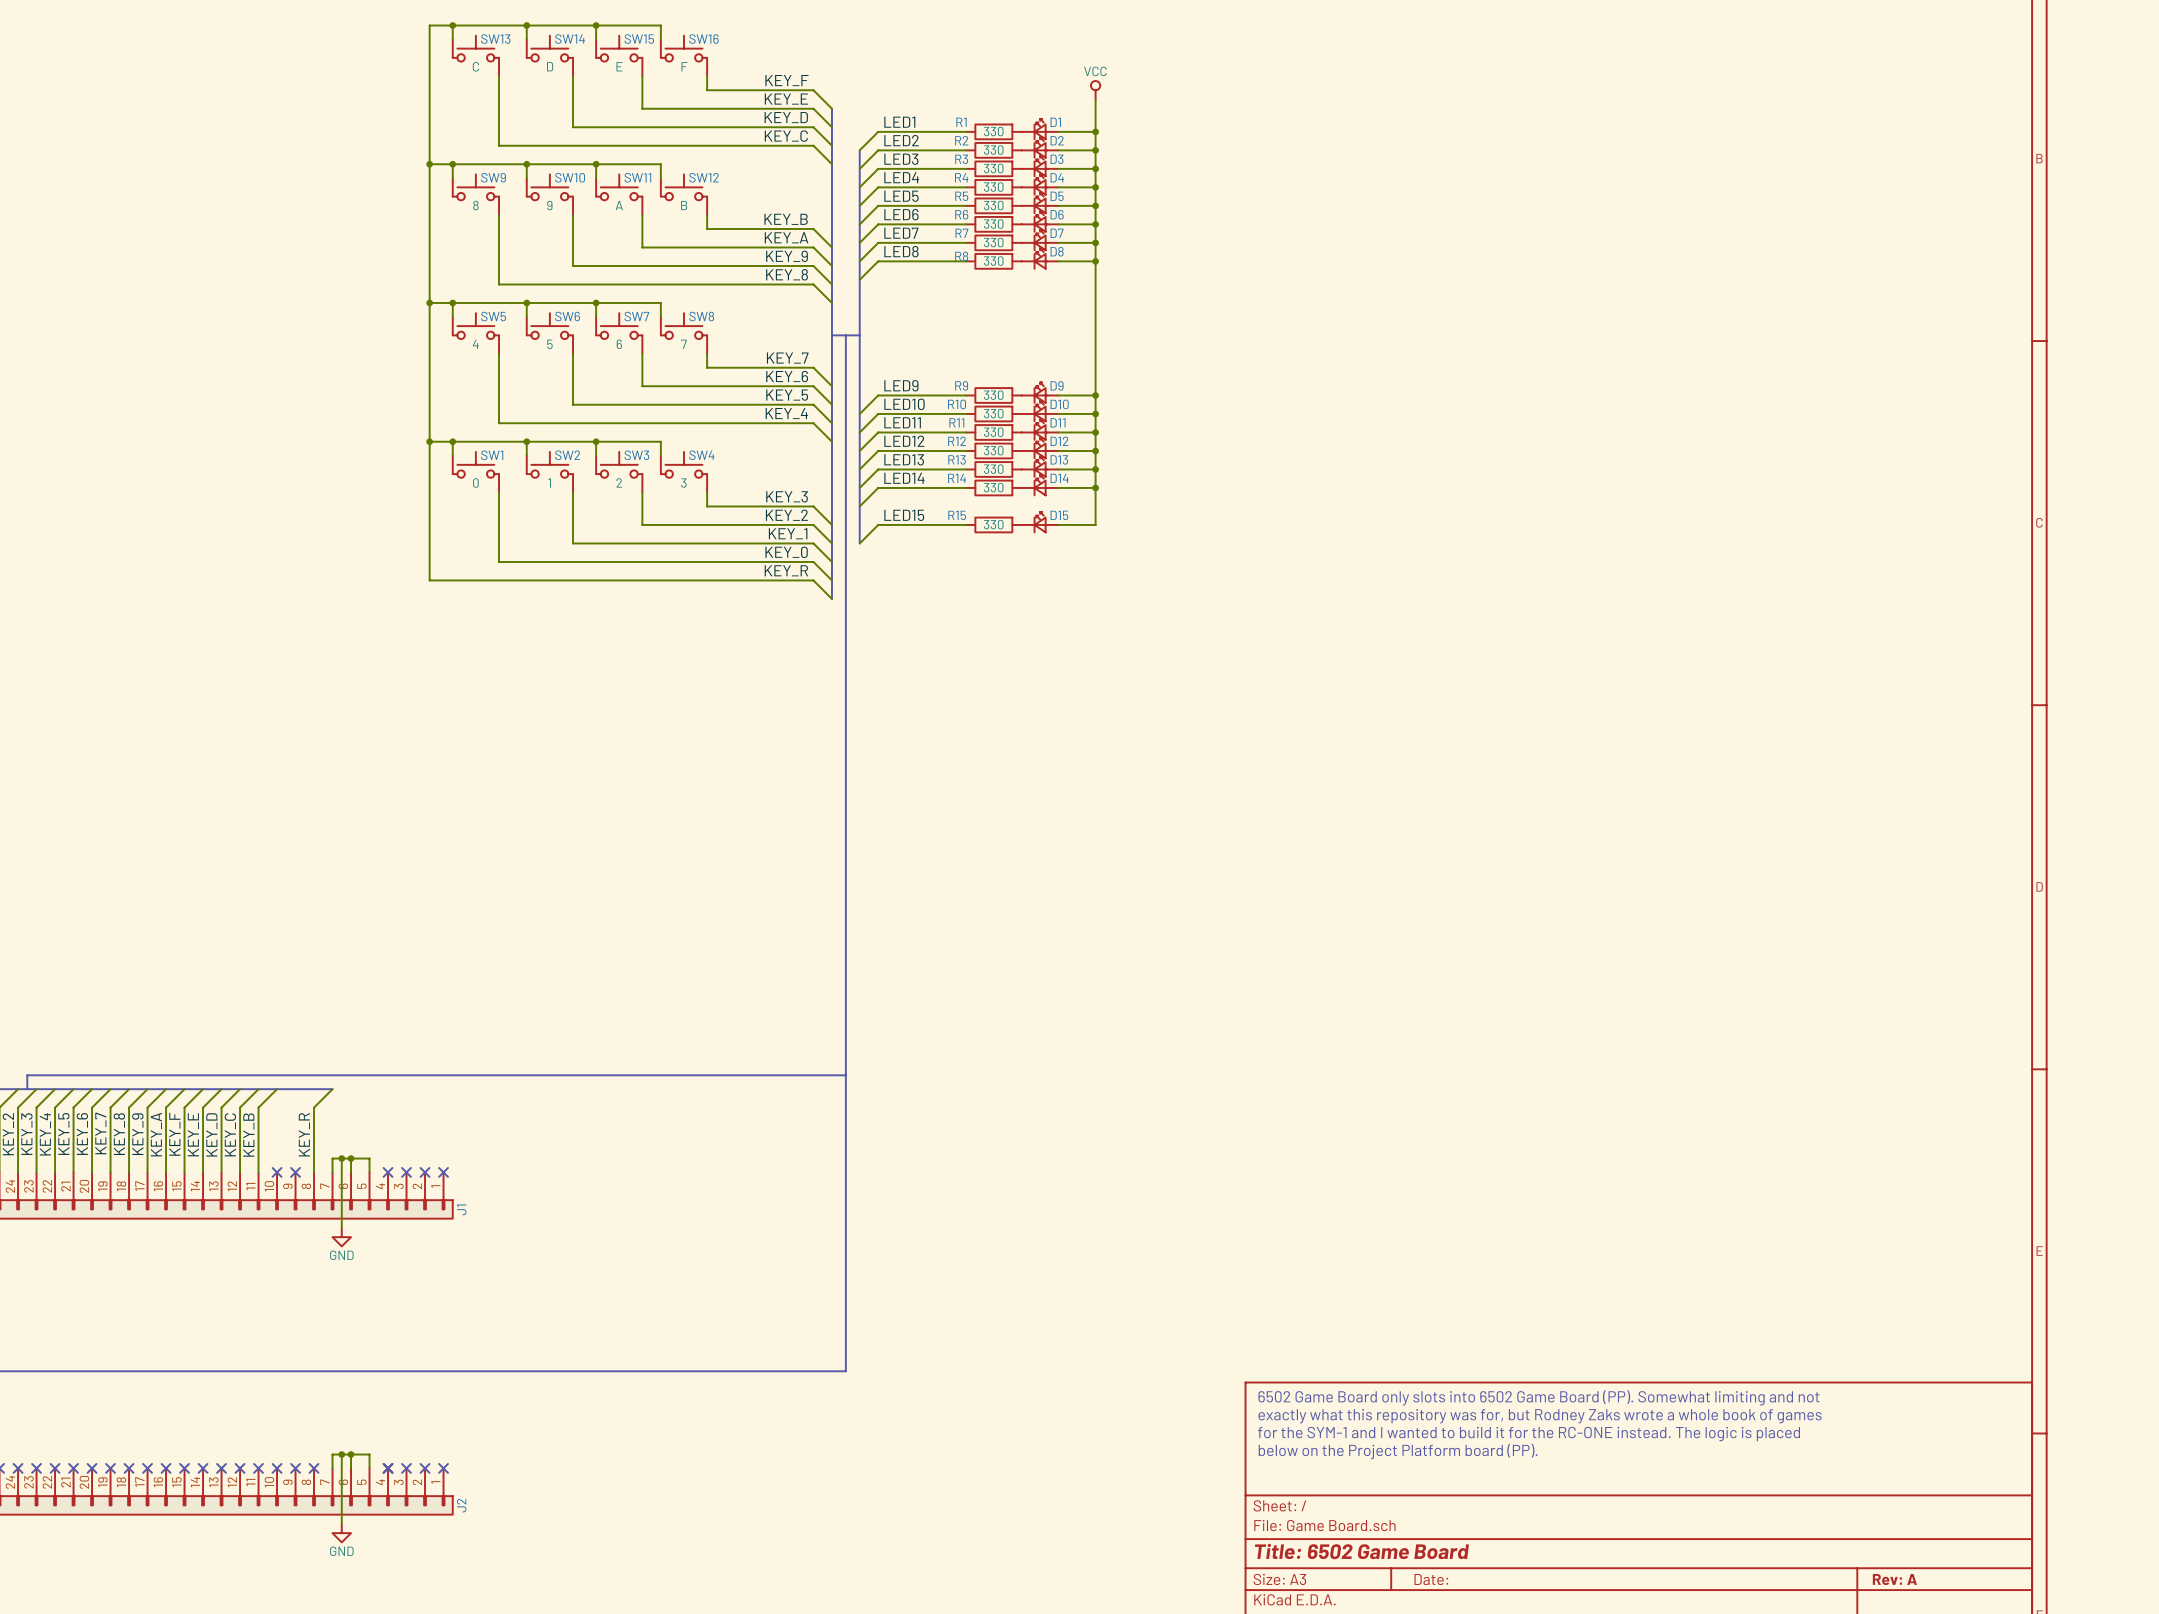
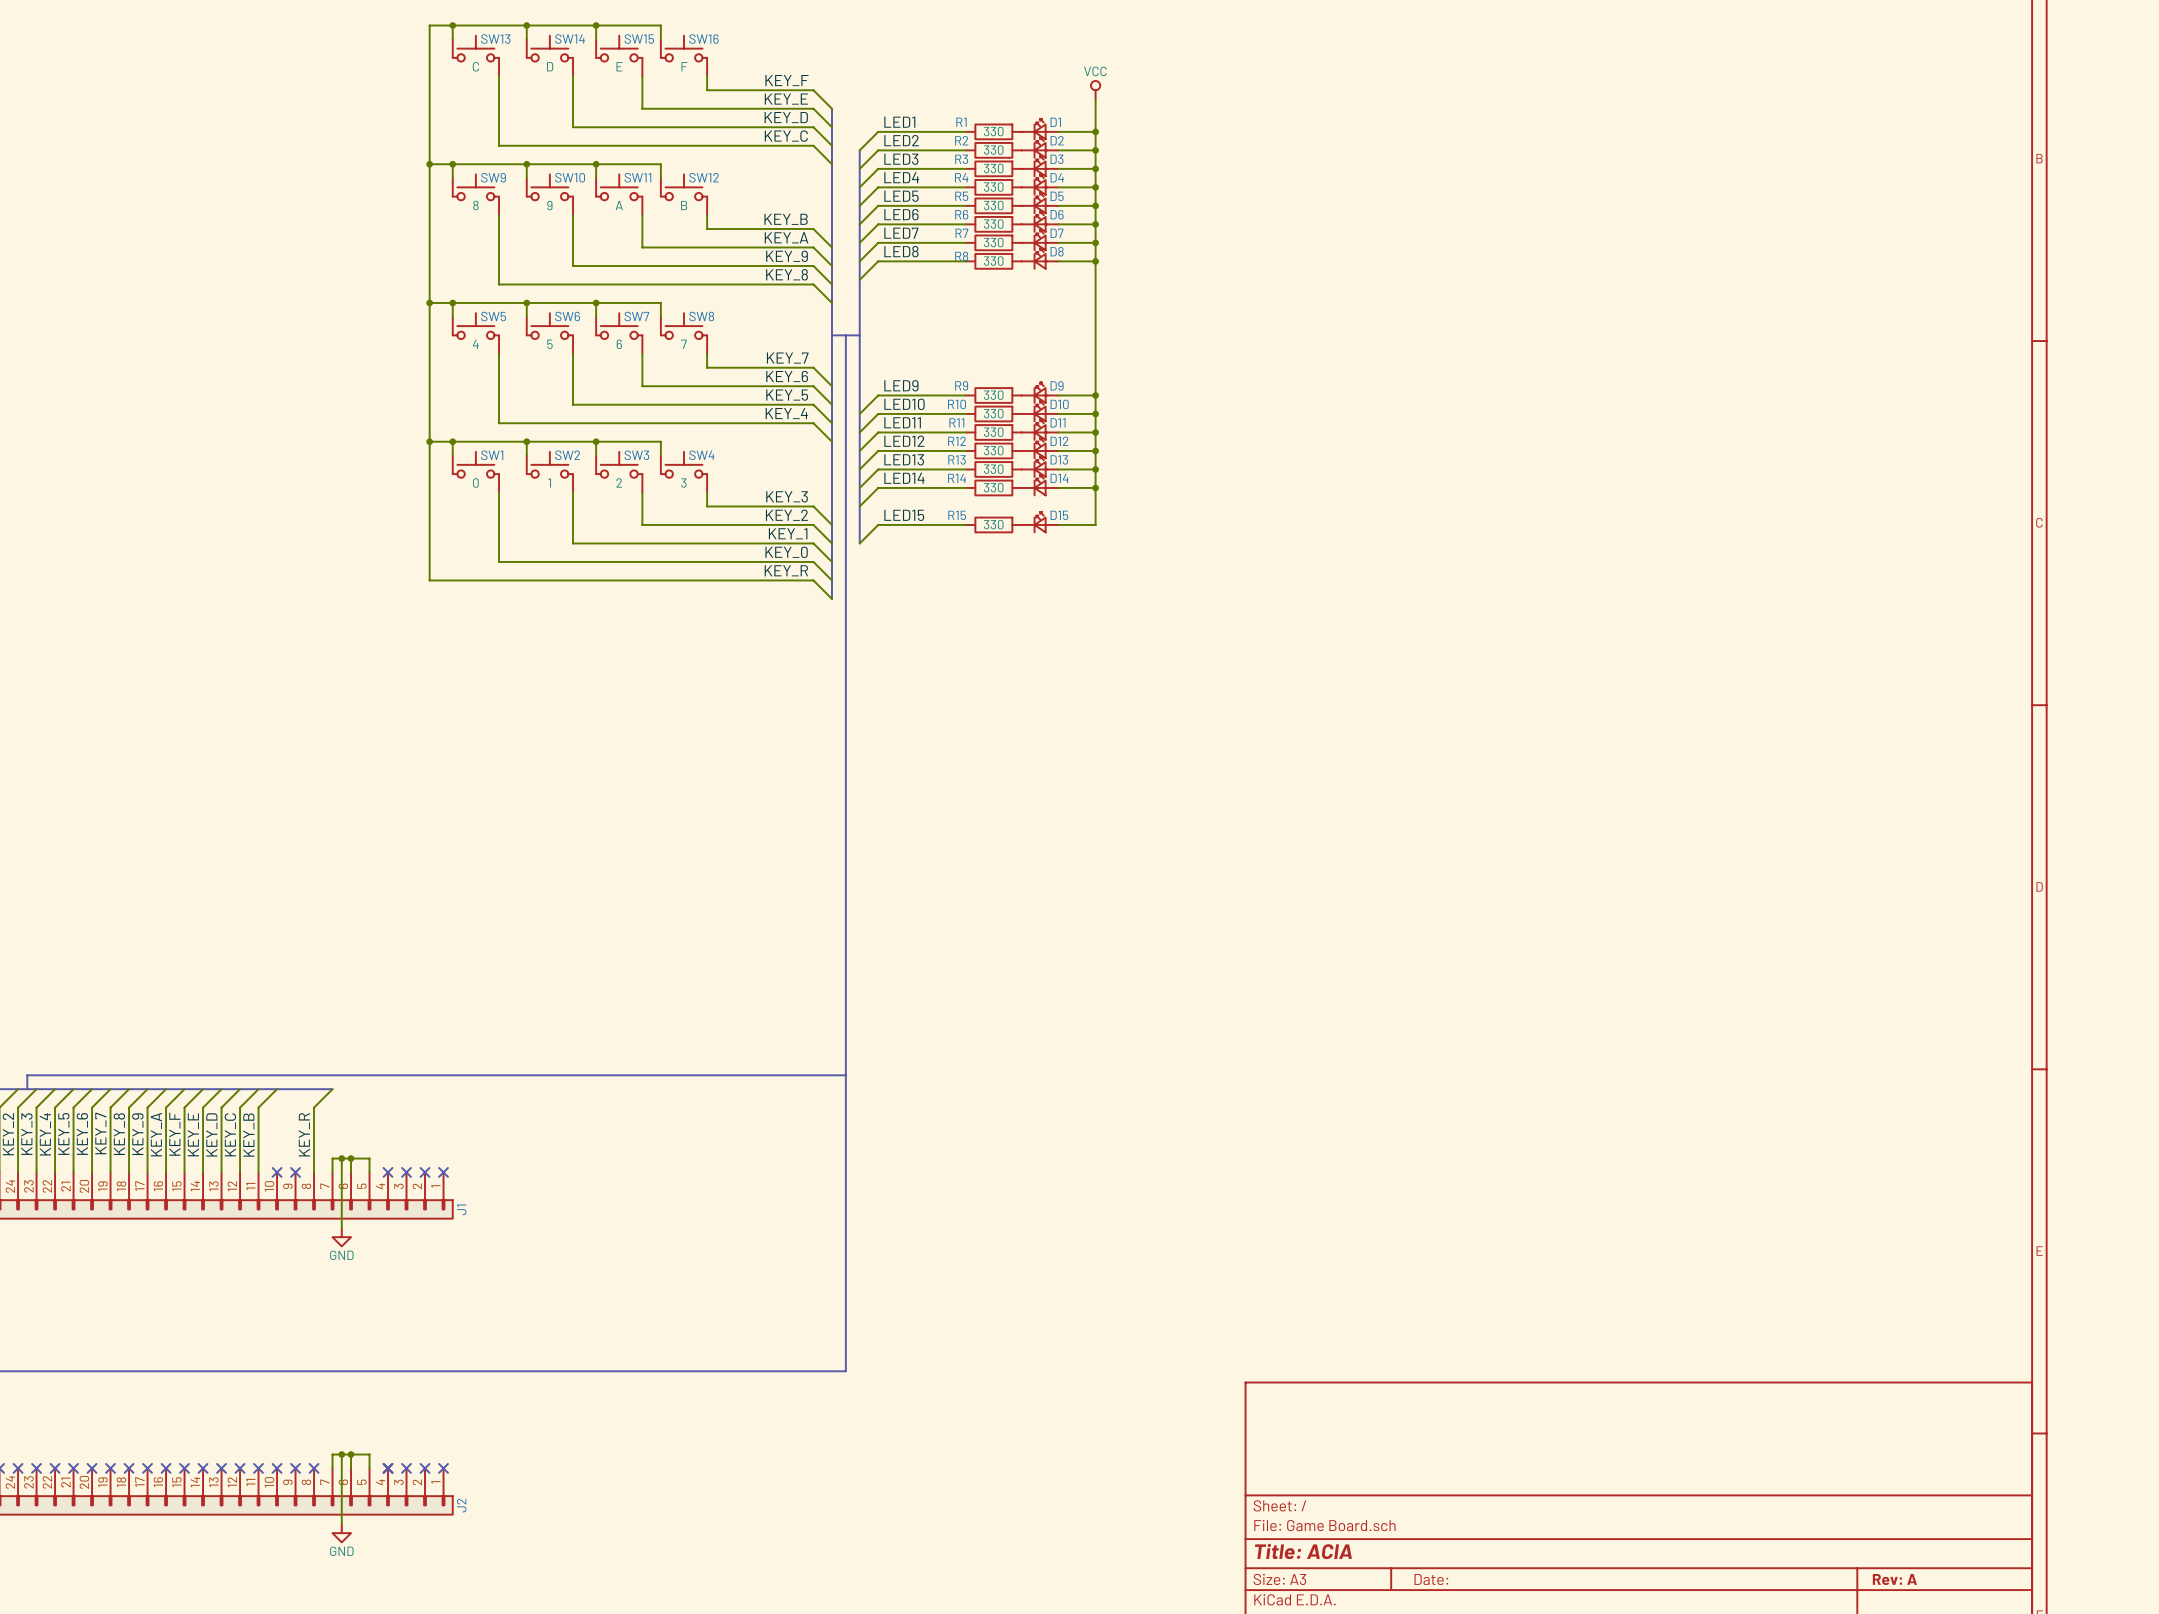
text: 6502 Game Board only slots into 6502 Game Board (PP). Somewhat limiting and not (1539, 1397) -> none
text: exactly what this repository was for, but Rodney Zaks wrote a whole book of games (1540, 1416) -> none
text: for the SYM-1 and I wanted to build it for the RC-ONE instead. The logic is placed (1529, 1434) -> none
text: below on the Project Platform board (PP). (1398, 1451) -> none
title block: Title: 6502 Game Board (1361, 1551) -> Title: ACIA (1303, 1551)

